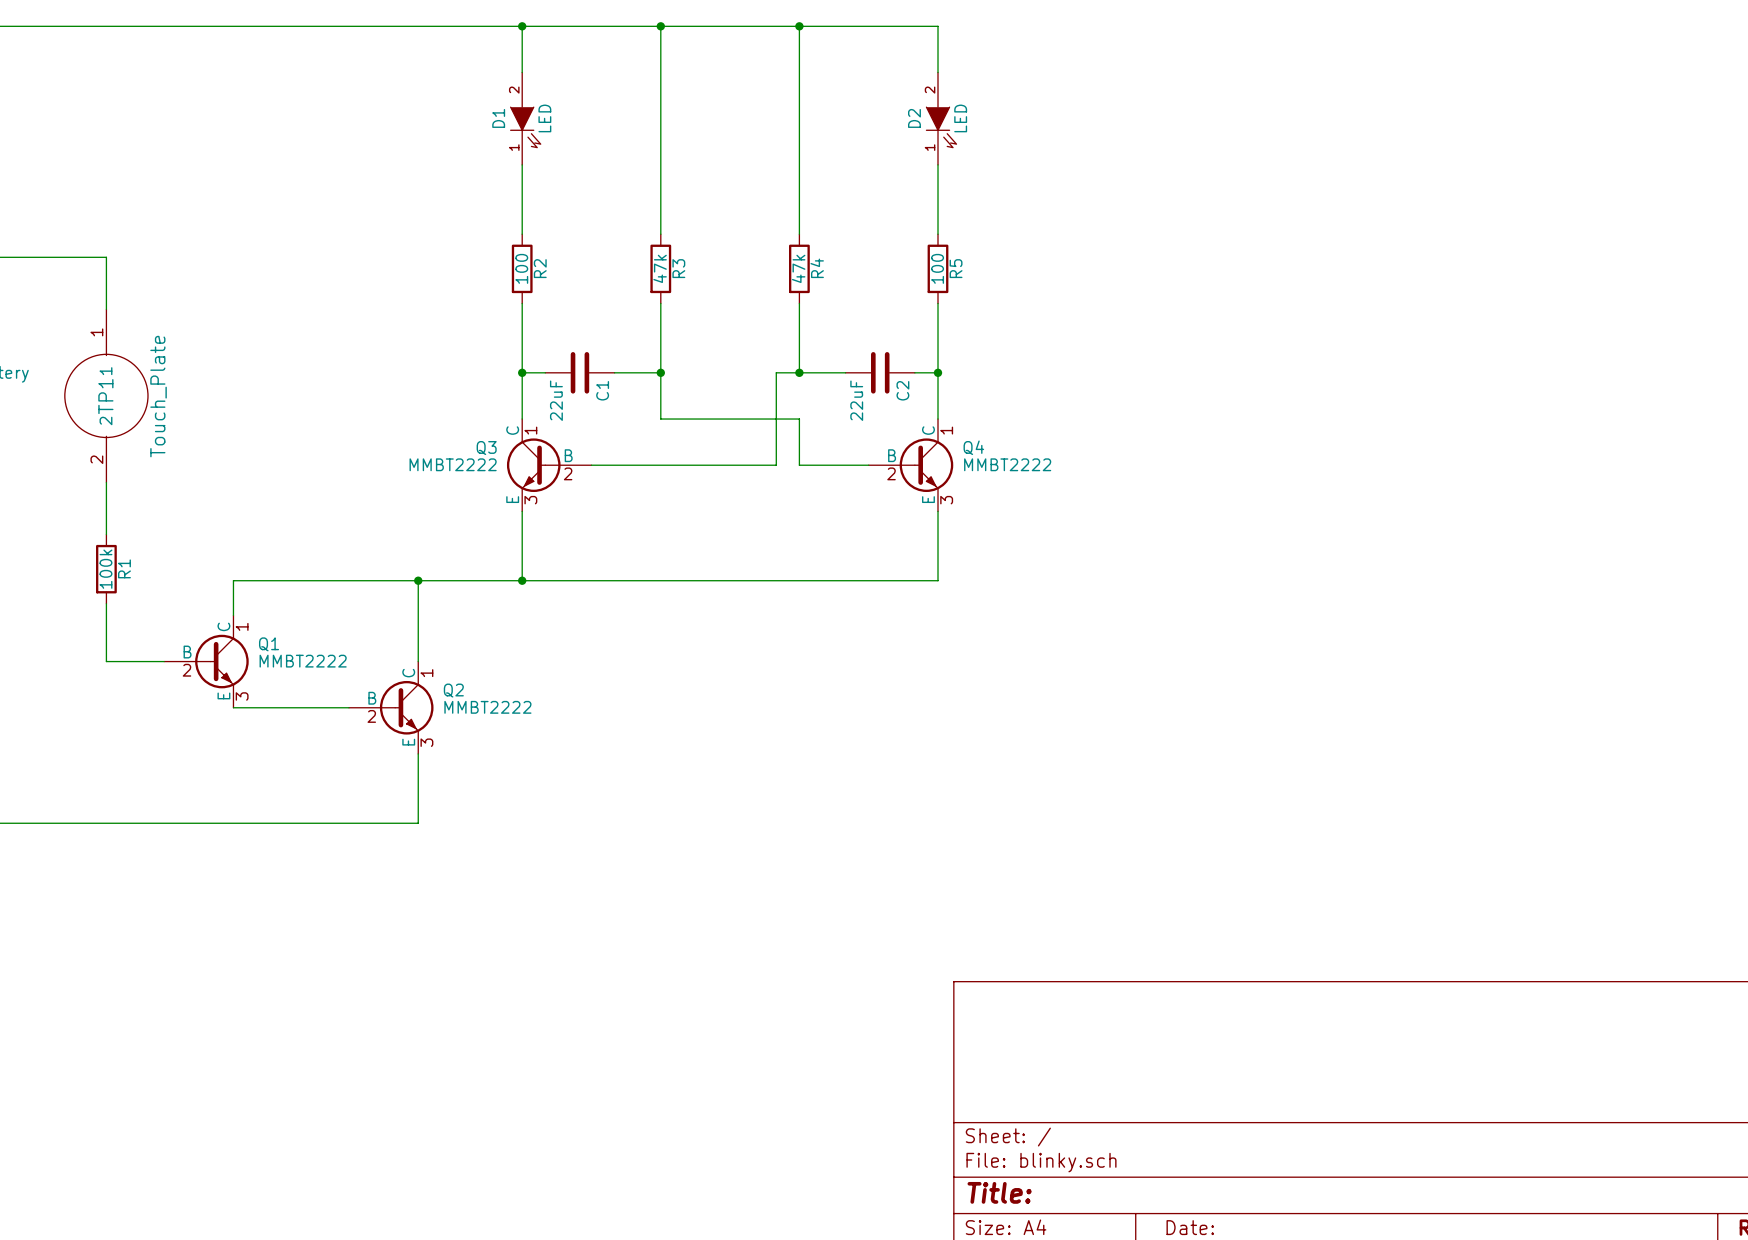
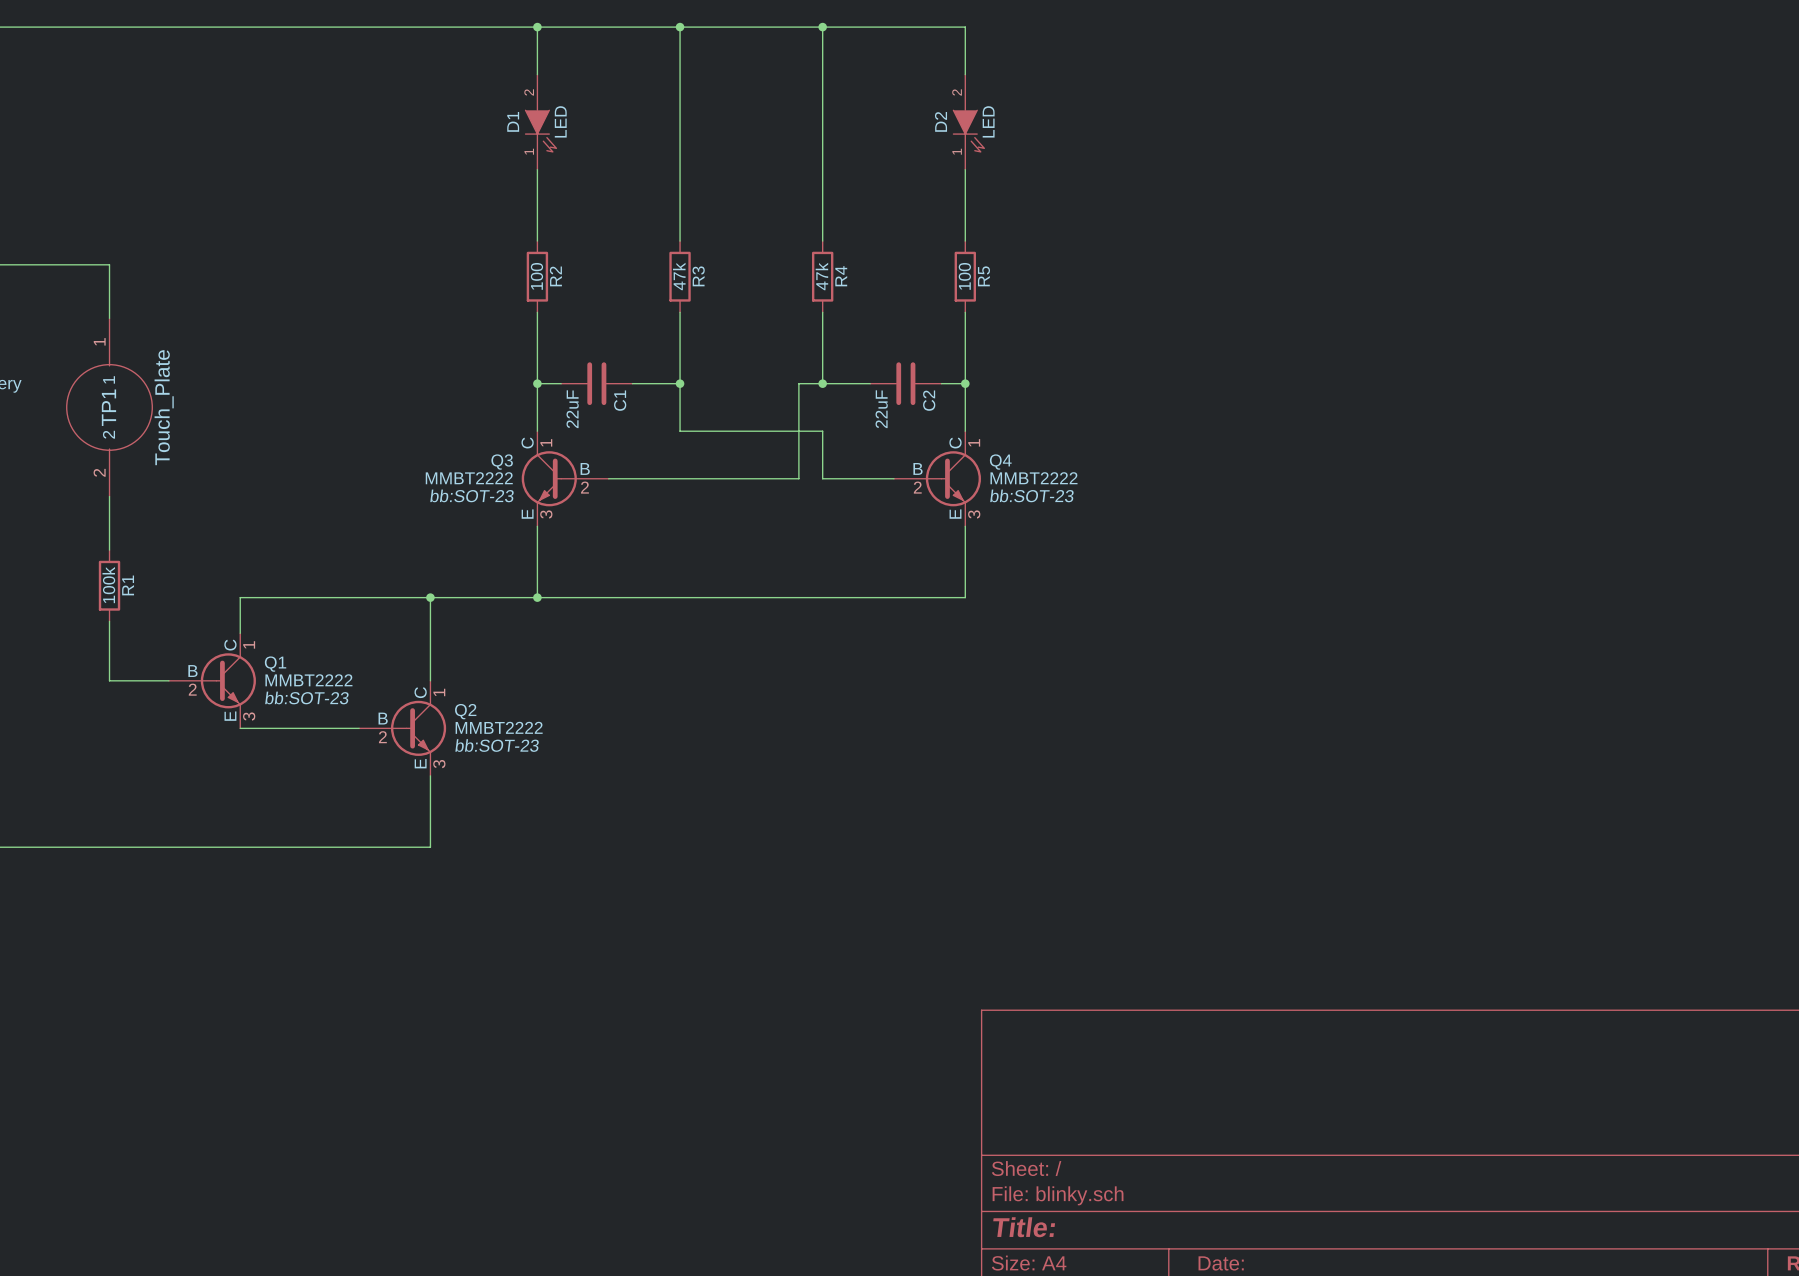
Q3 text: none -> bb:SOT-23 (472, 495)
Q4 text: none -> bb:SOT-23 (1031, 495)
Q1 text: none -> bb:SOT-23 (306, 697)
Q2 text: none -> bb:SOT-23 (497, 745)

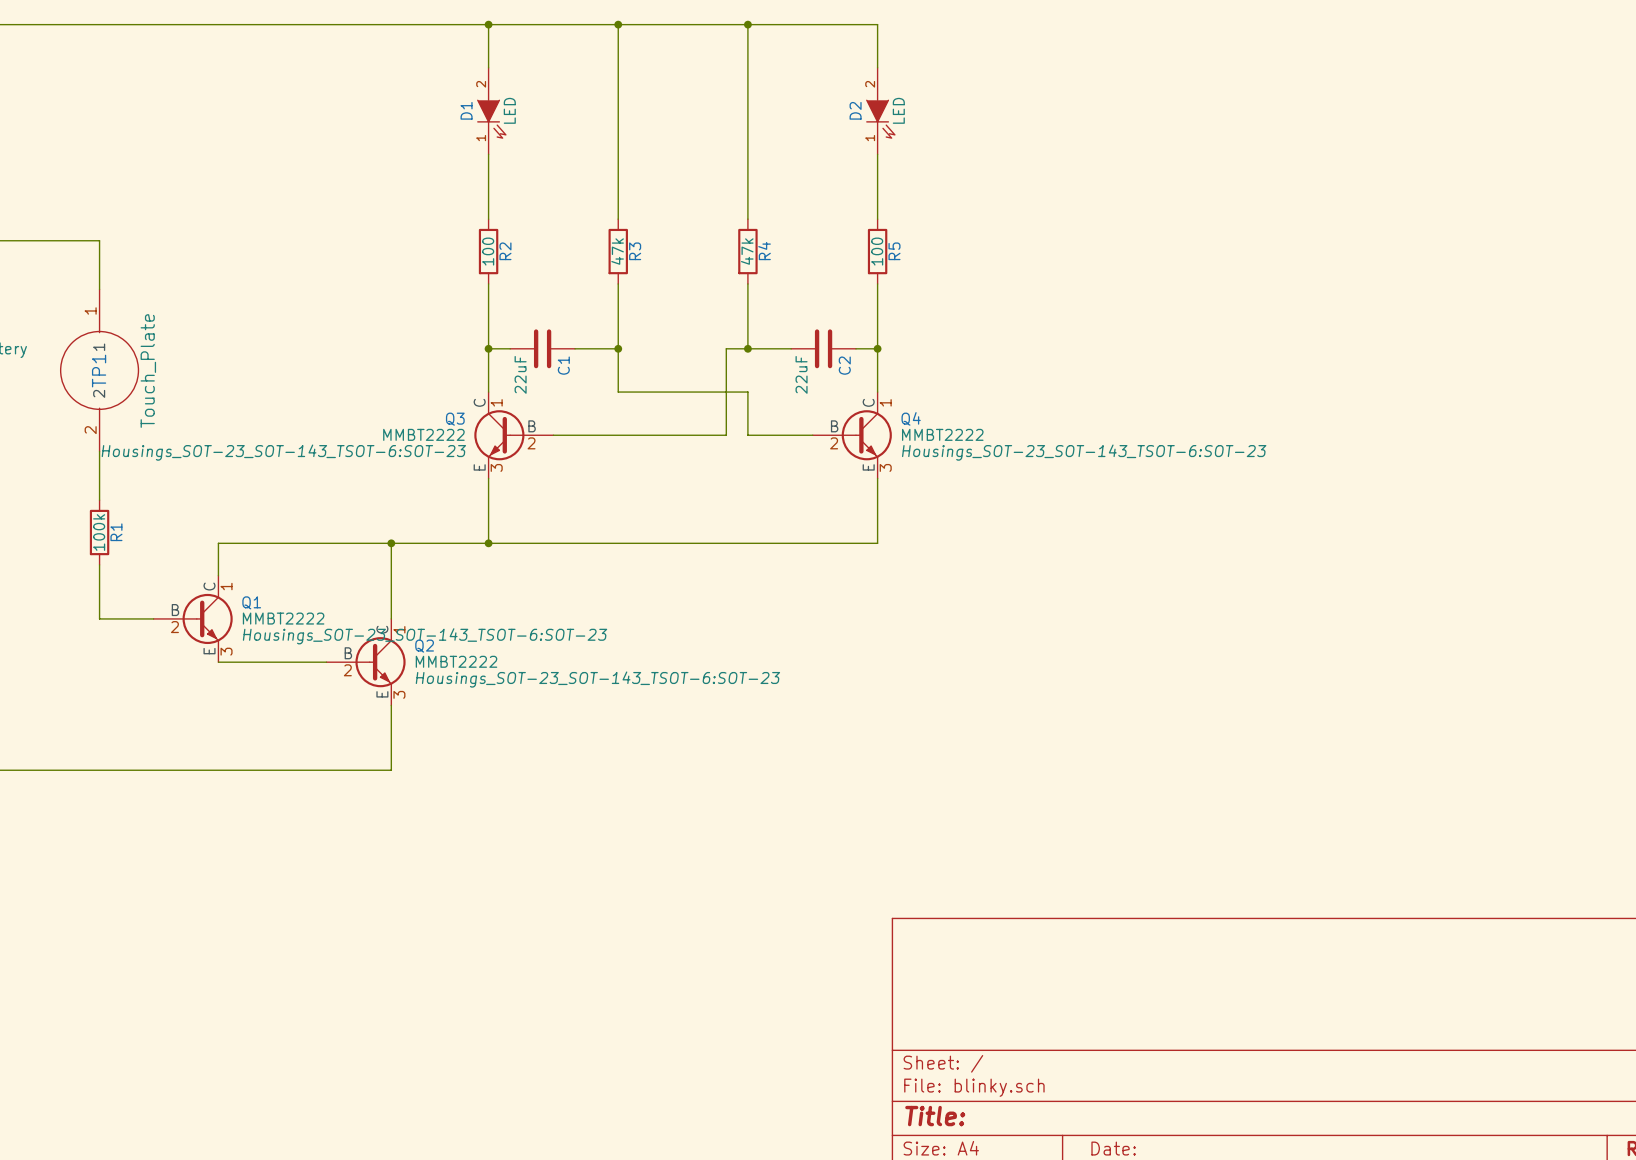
Q3 text: bb:SOT-23 (472, 495) -> Housings_SOT-23_SOT-143_TSOT-6:SOT-23 (283, 452)
Q4 text: bb:SOT-23 (1031, 495) -> Housings_SOT-23_SOT-143_TSOT-6:SOT-23 (1084, 452)
Q1 text: bb:SOT-23 (306, 697) -> Housings_SOT-23_SOT-143_TSOT-6:SOT-23 (425, 636)
Q2 text: bb:SOT-23 (497, 745) -> Housings_SOT-23_SOT-143_TSOT-6:SOT-23 (597, 679)

